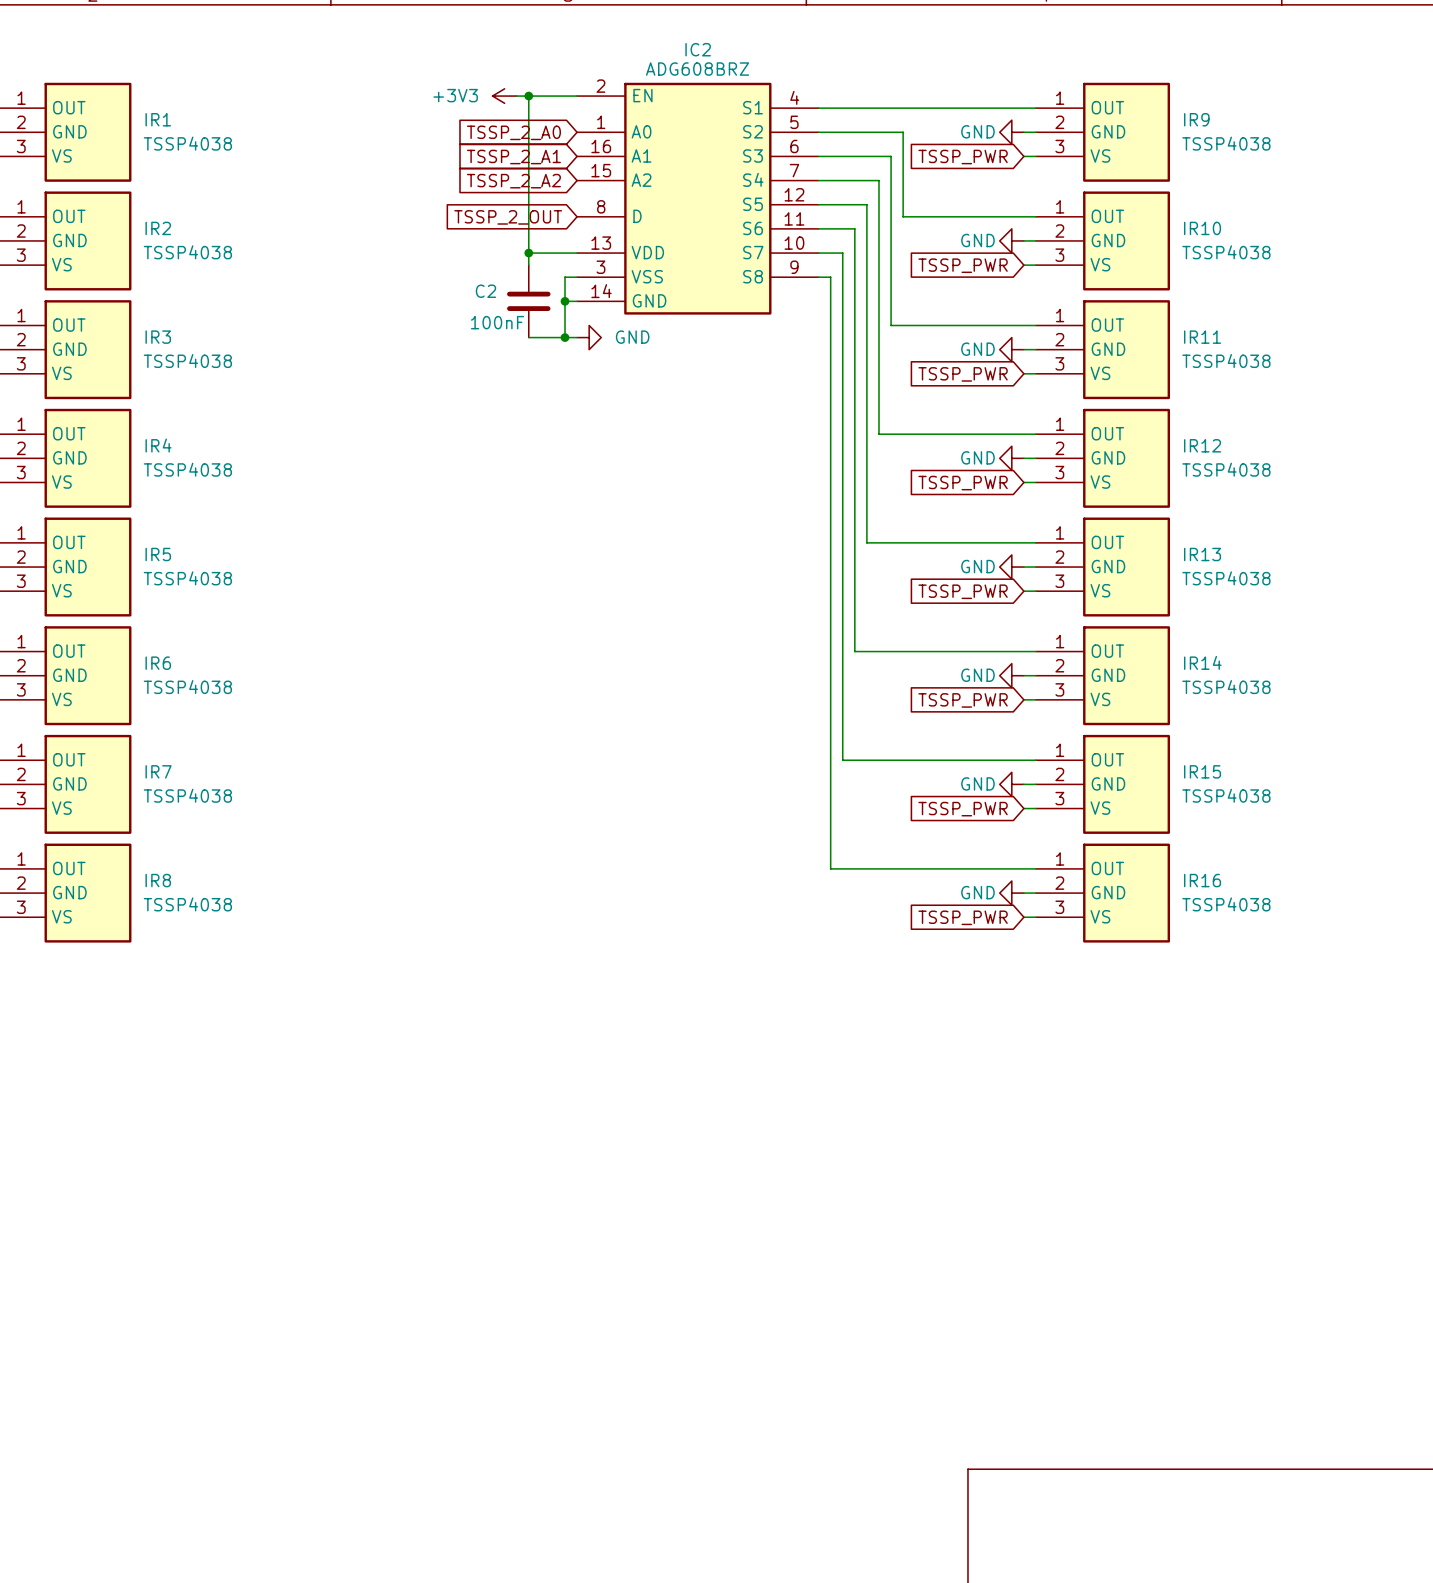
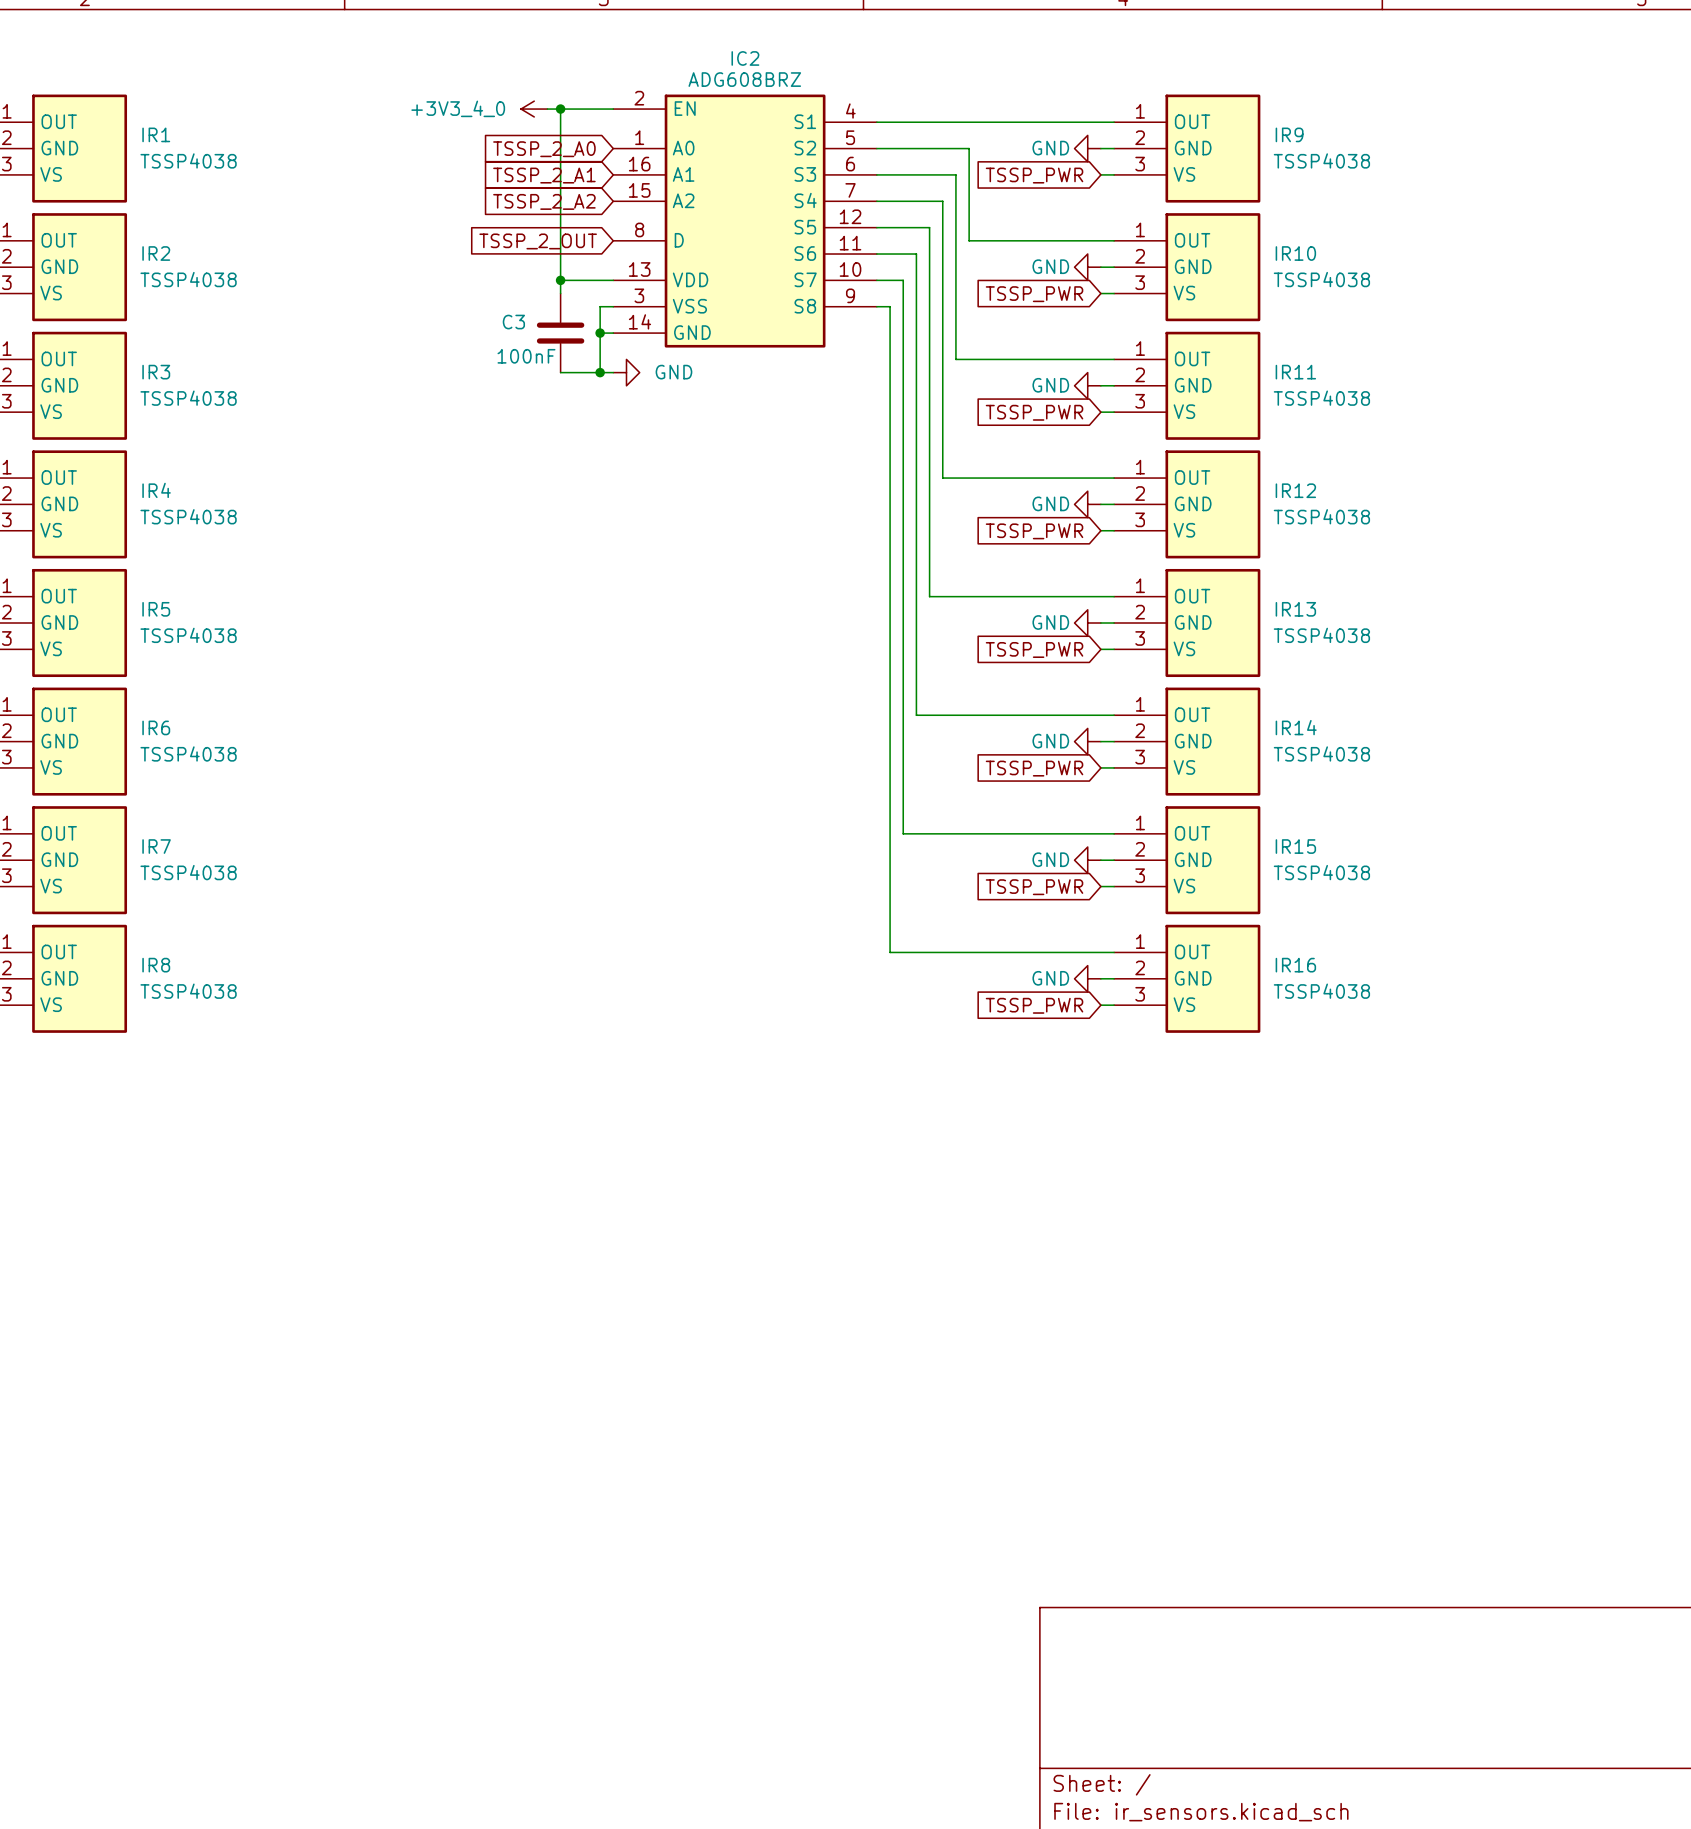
power symbol: +3V3 (504, 96) -> +3V3_4_0 (534, 109)
C2 name: C2 (485, 291) -> C3 (513, 322)

